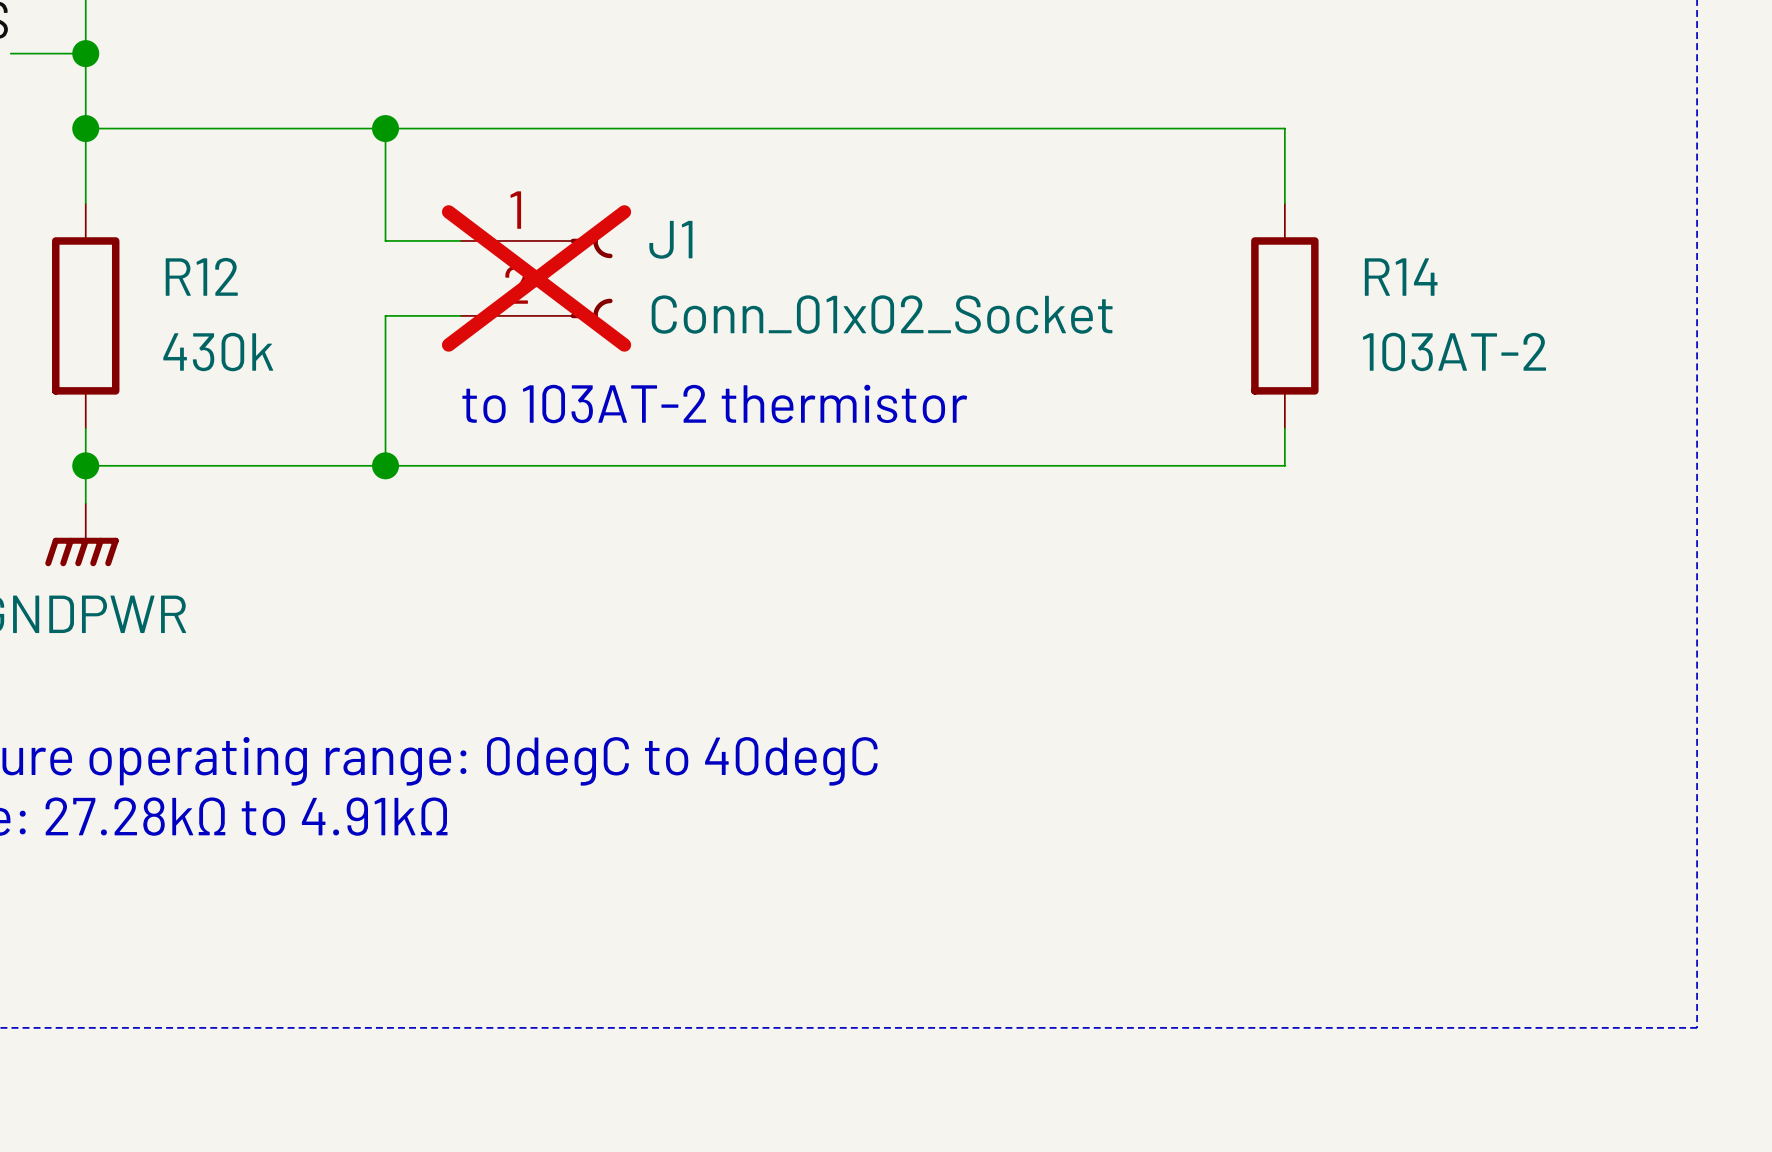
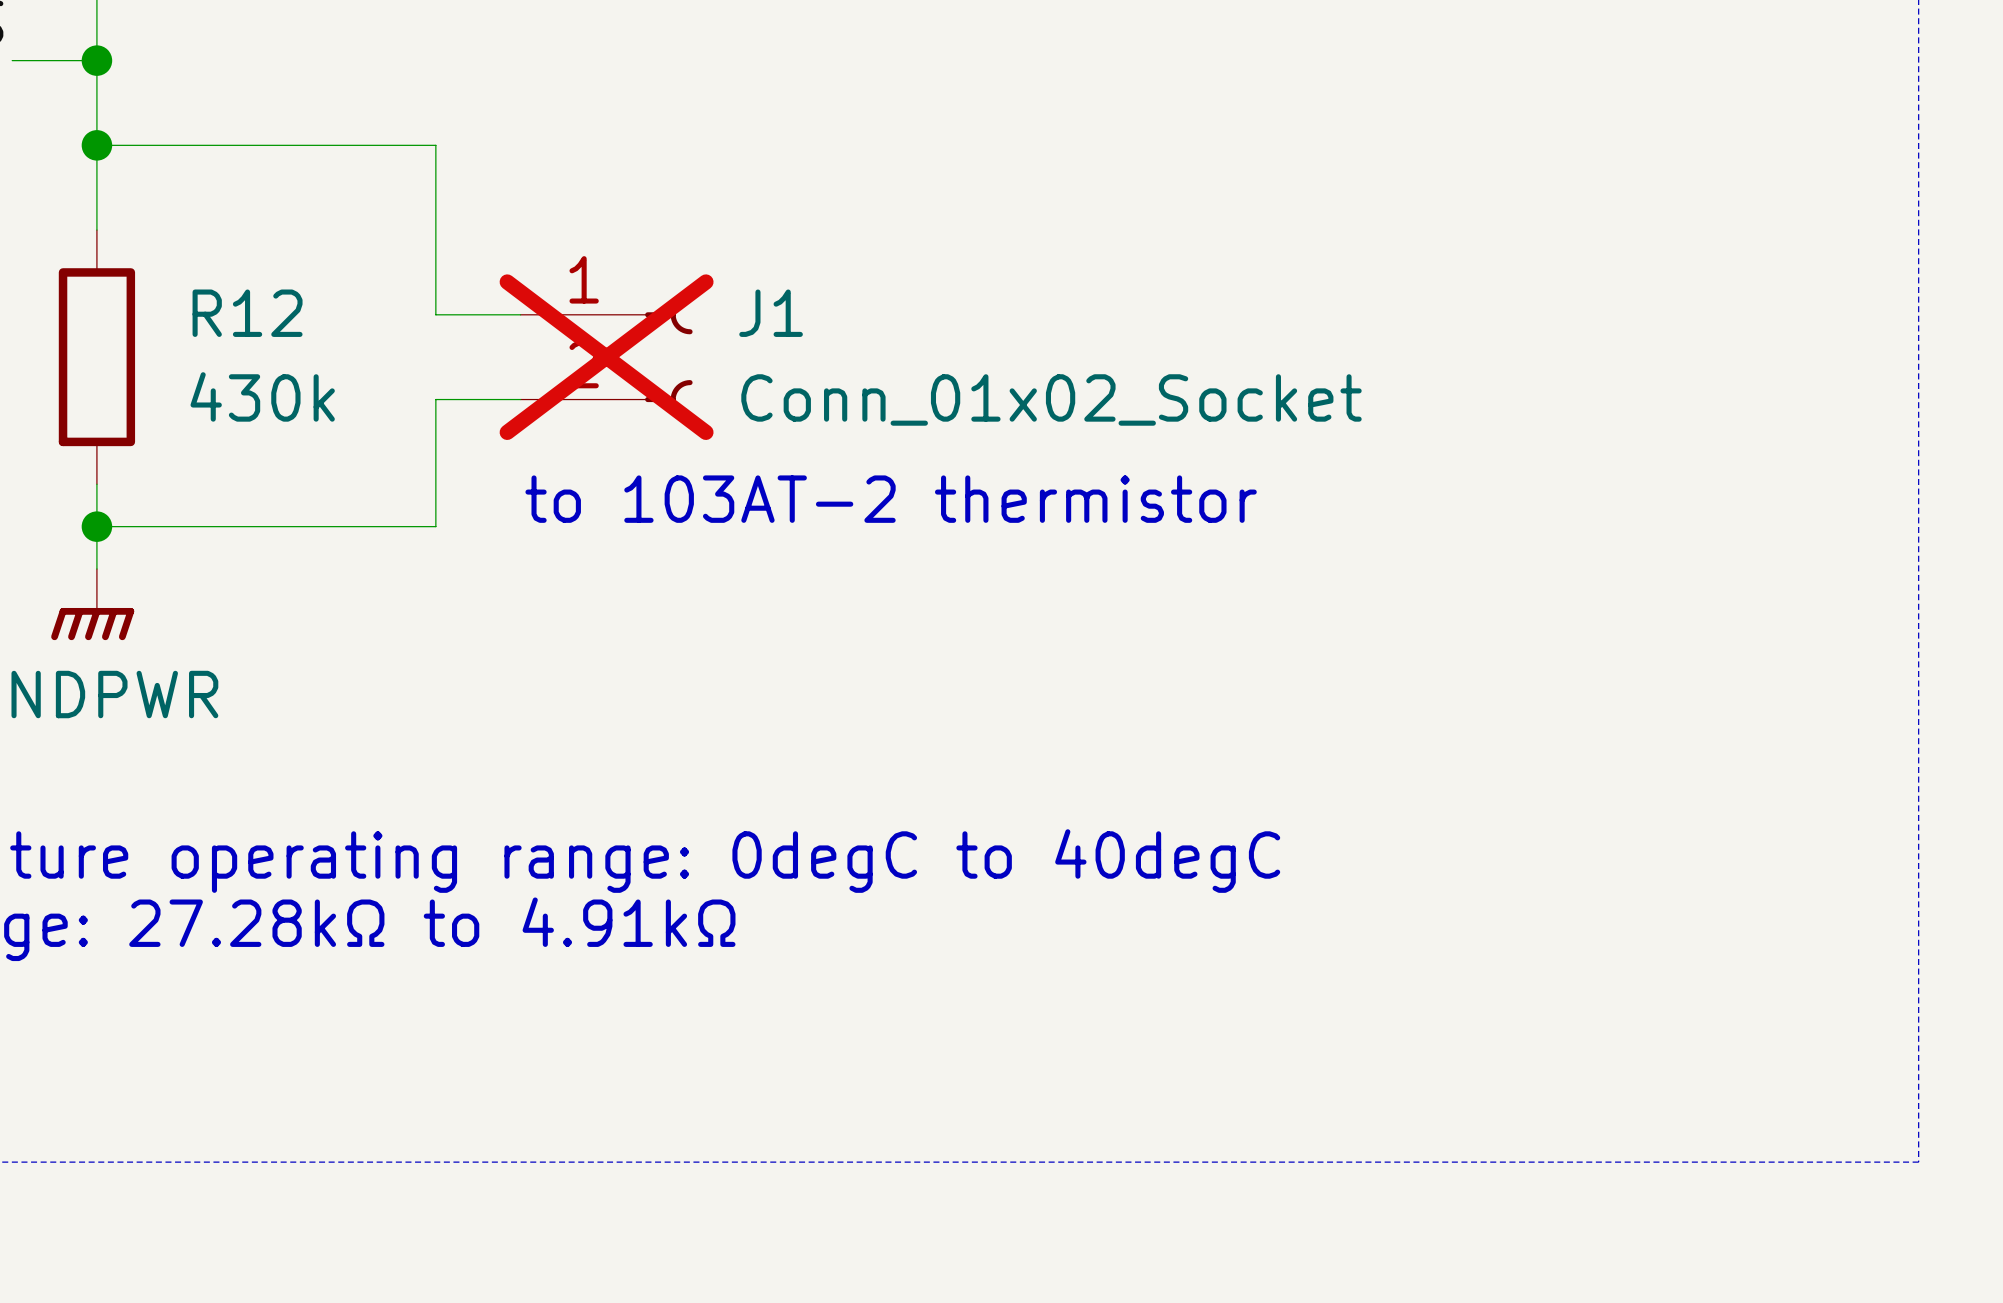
wire: (385, 128) (1284, 128) (1284, 203) -> none
junction: (385, 128) -> none
wire: (385, 240) (460, 240) -> (435, 272) (435, 314) (520, 314)
J1 position: (536, 278) -> (606, 357)
wire: (460, 315) (385, 315) (385, 353) -> (520, 399) (435, 399)
R14: 103AT-2 (1284, 315) -> none
text position: to 103AT-2 thermistor (714, 404) -> to 103AT-2 thermistor (891, 499)
wire: (1284, 428) (1284, 465) (385, 465) -> none
junction: (385, 465) -> none

